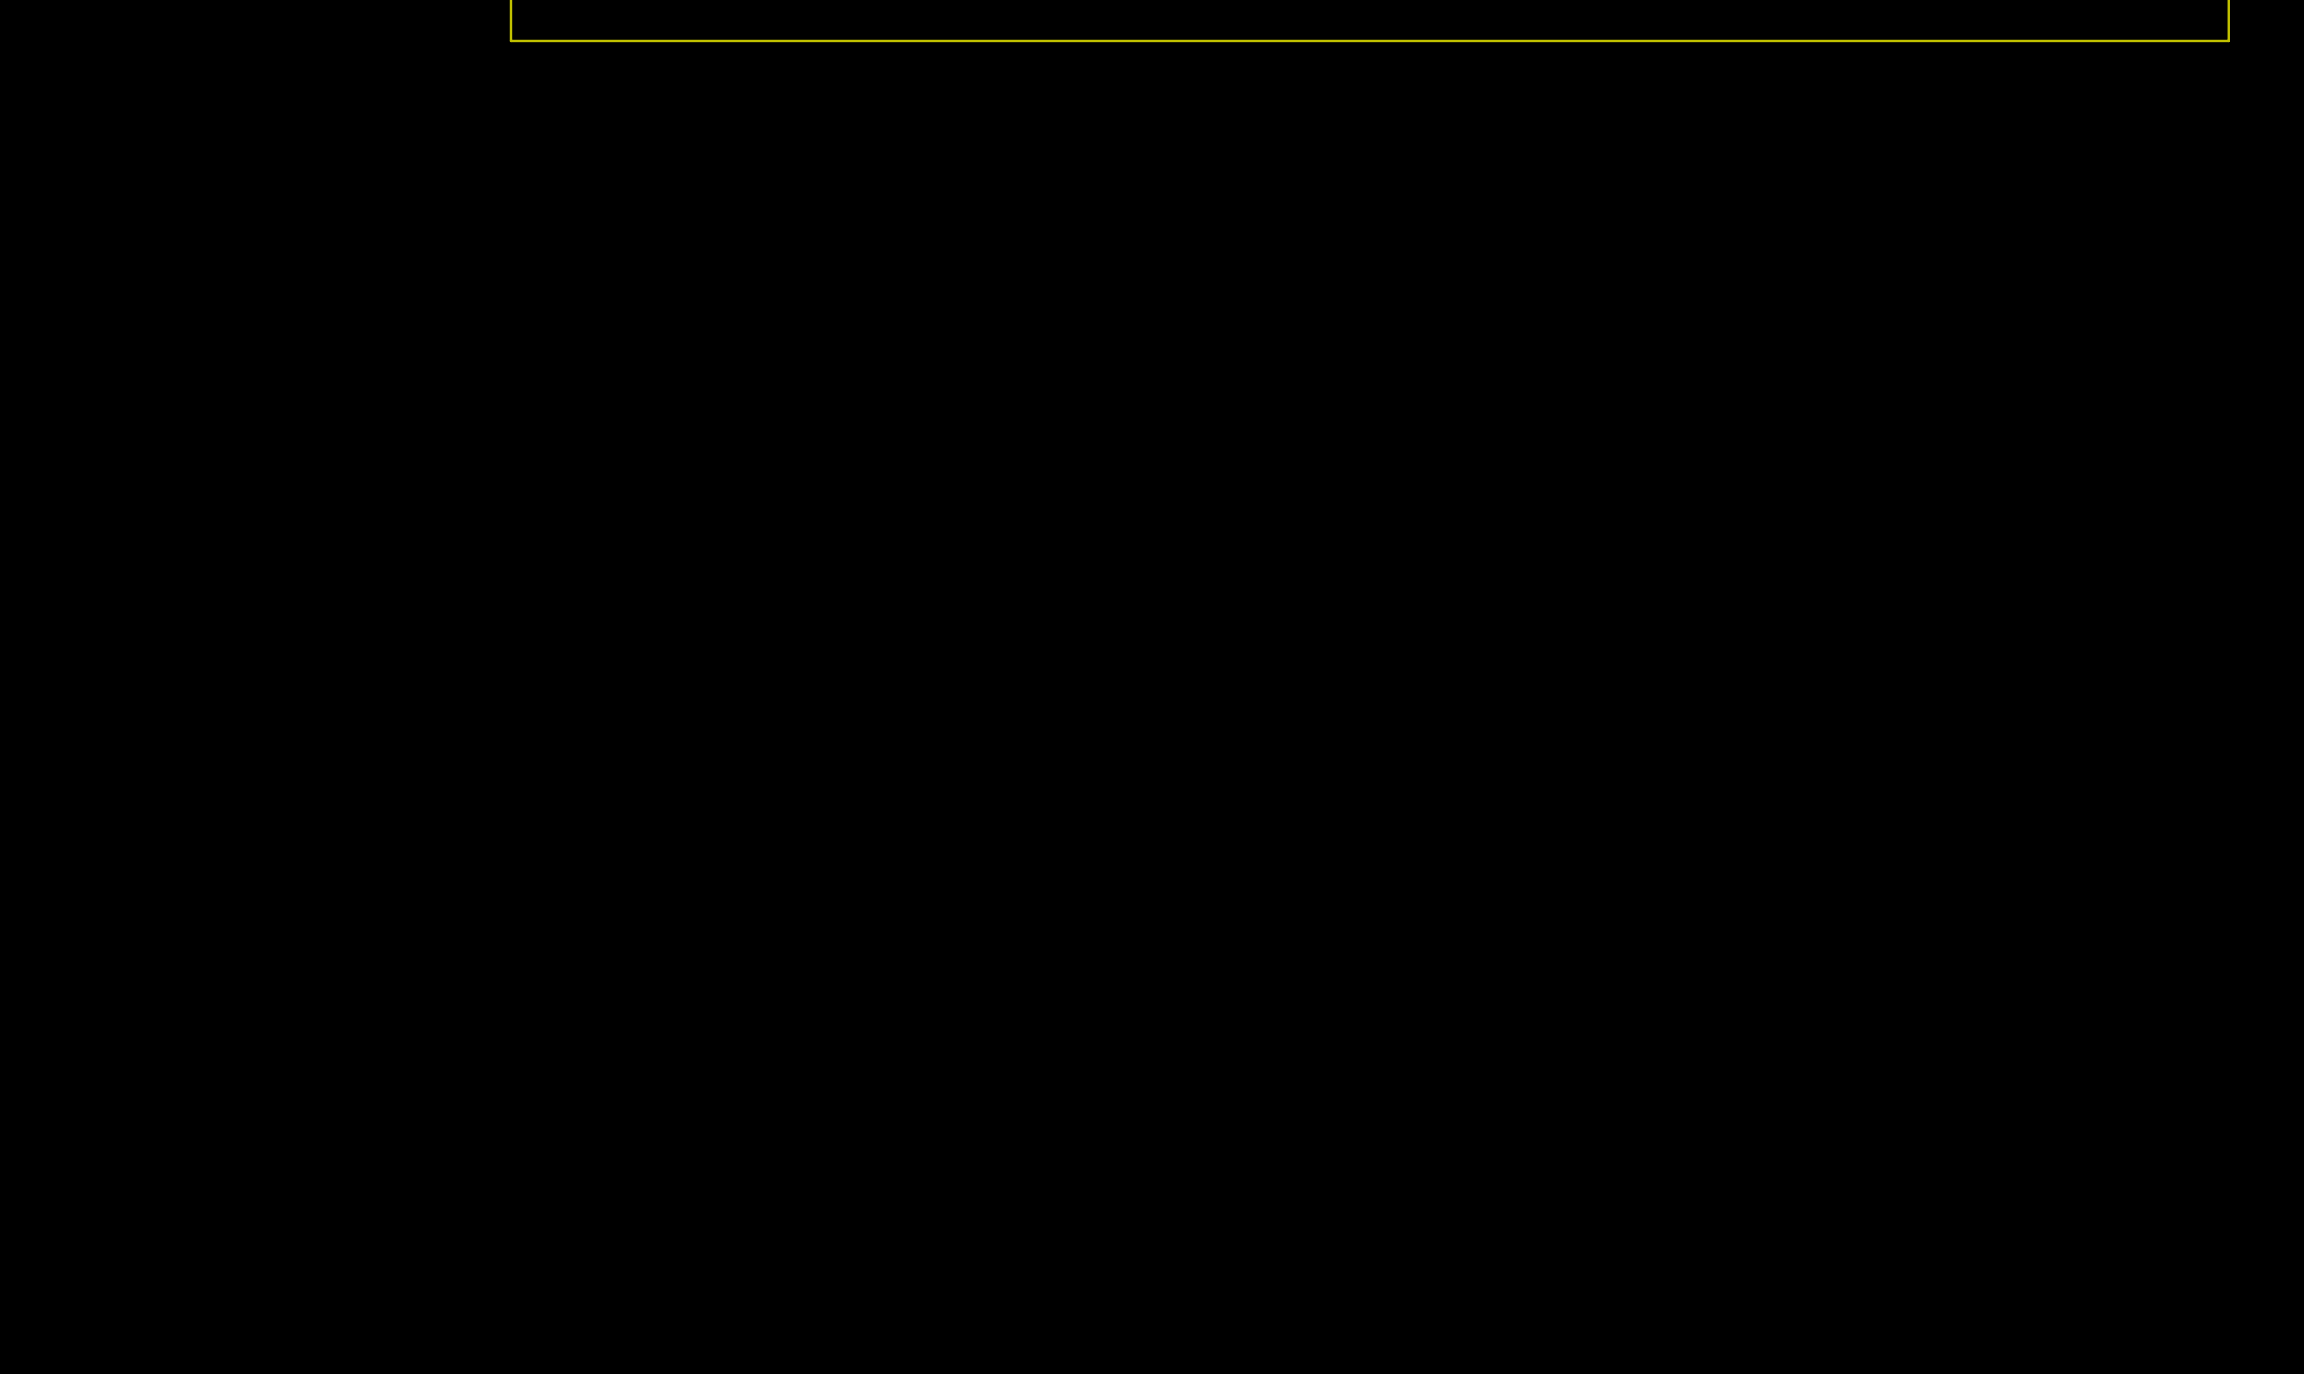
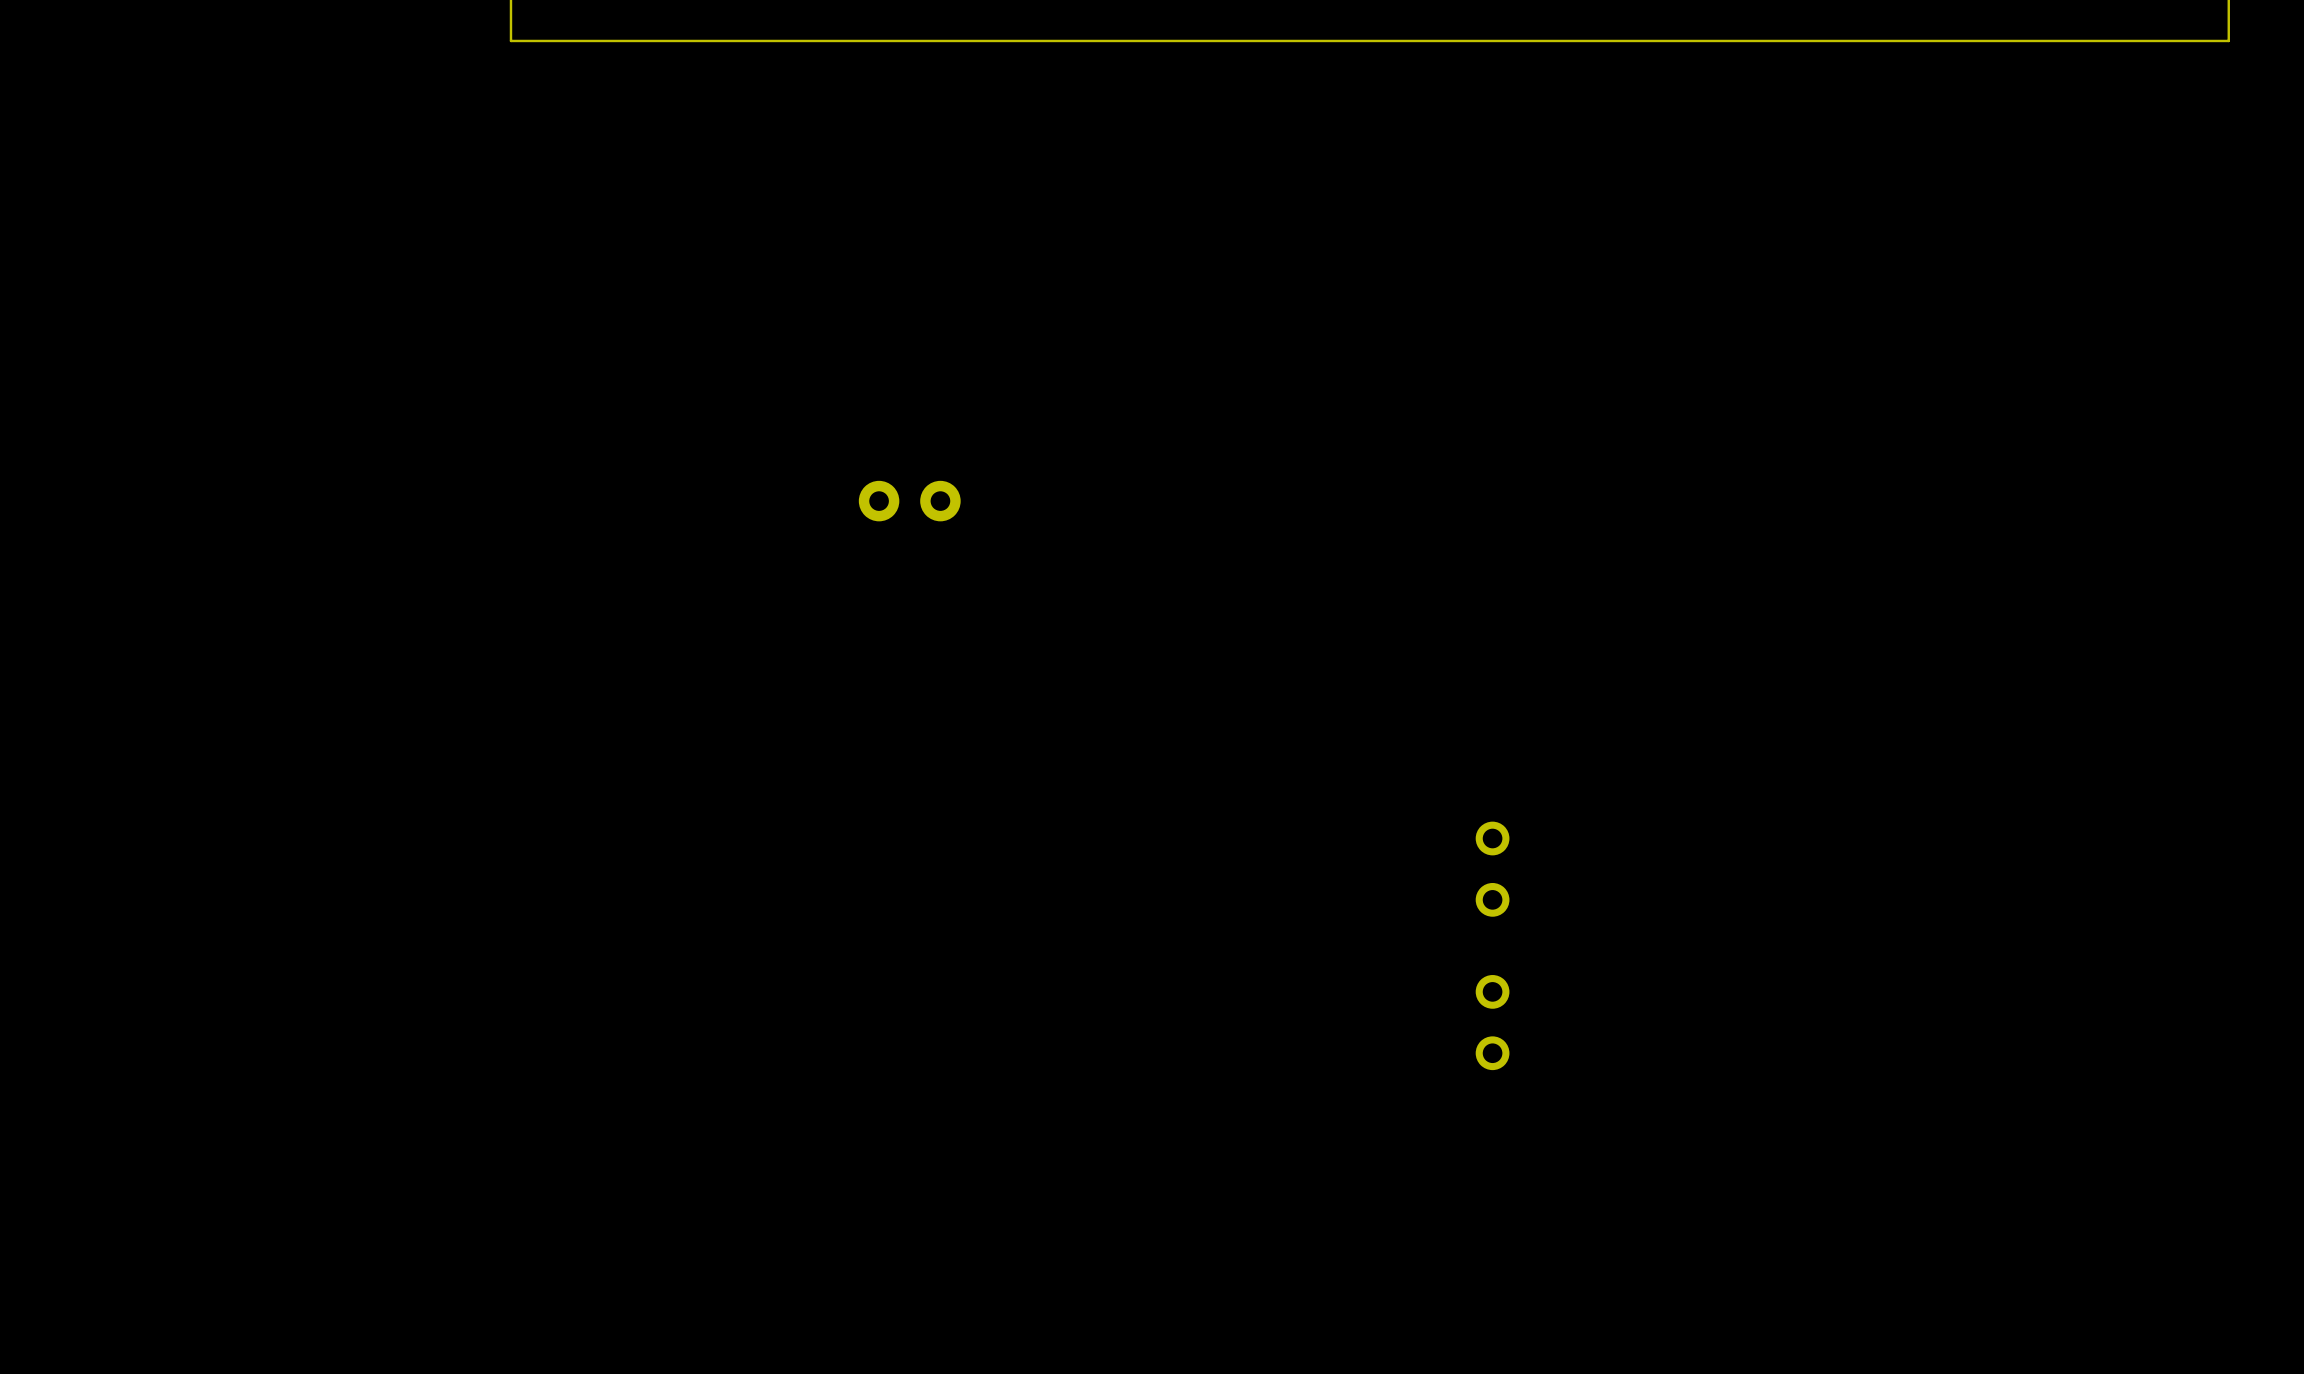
part: none -> (909, 501)
part: none -> (1492, 869)
part: none -> (1492, 1022)

